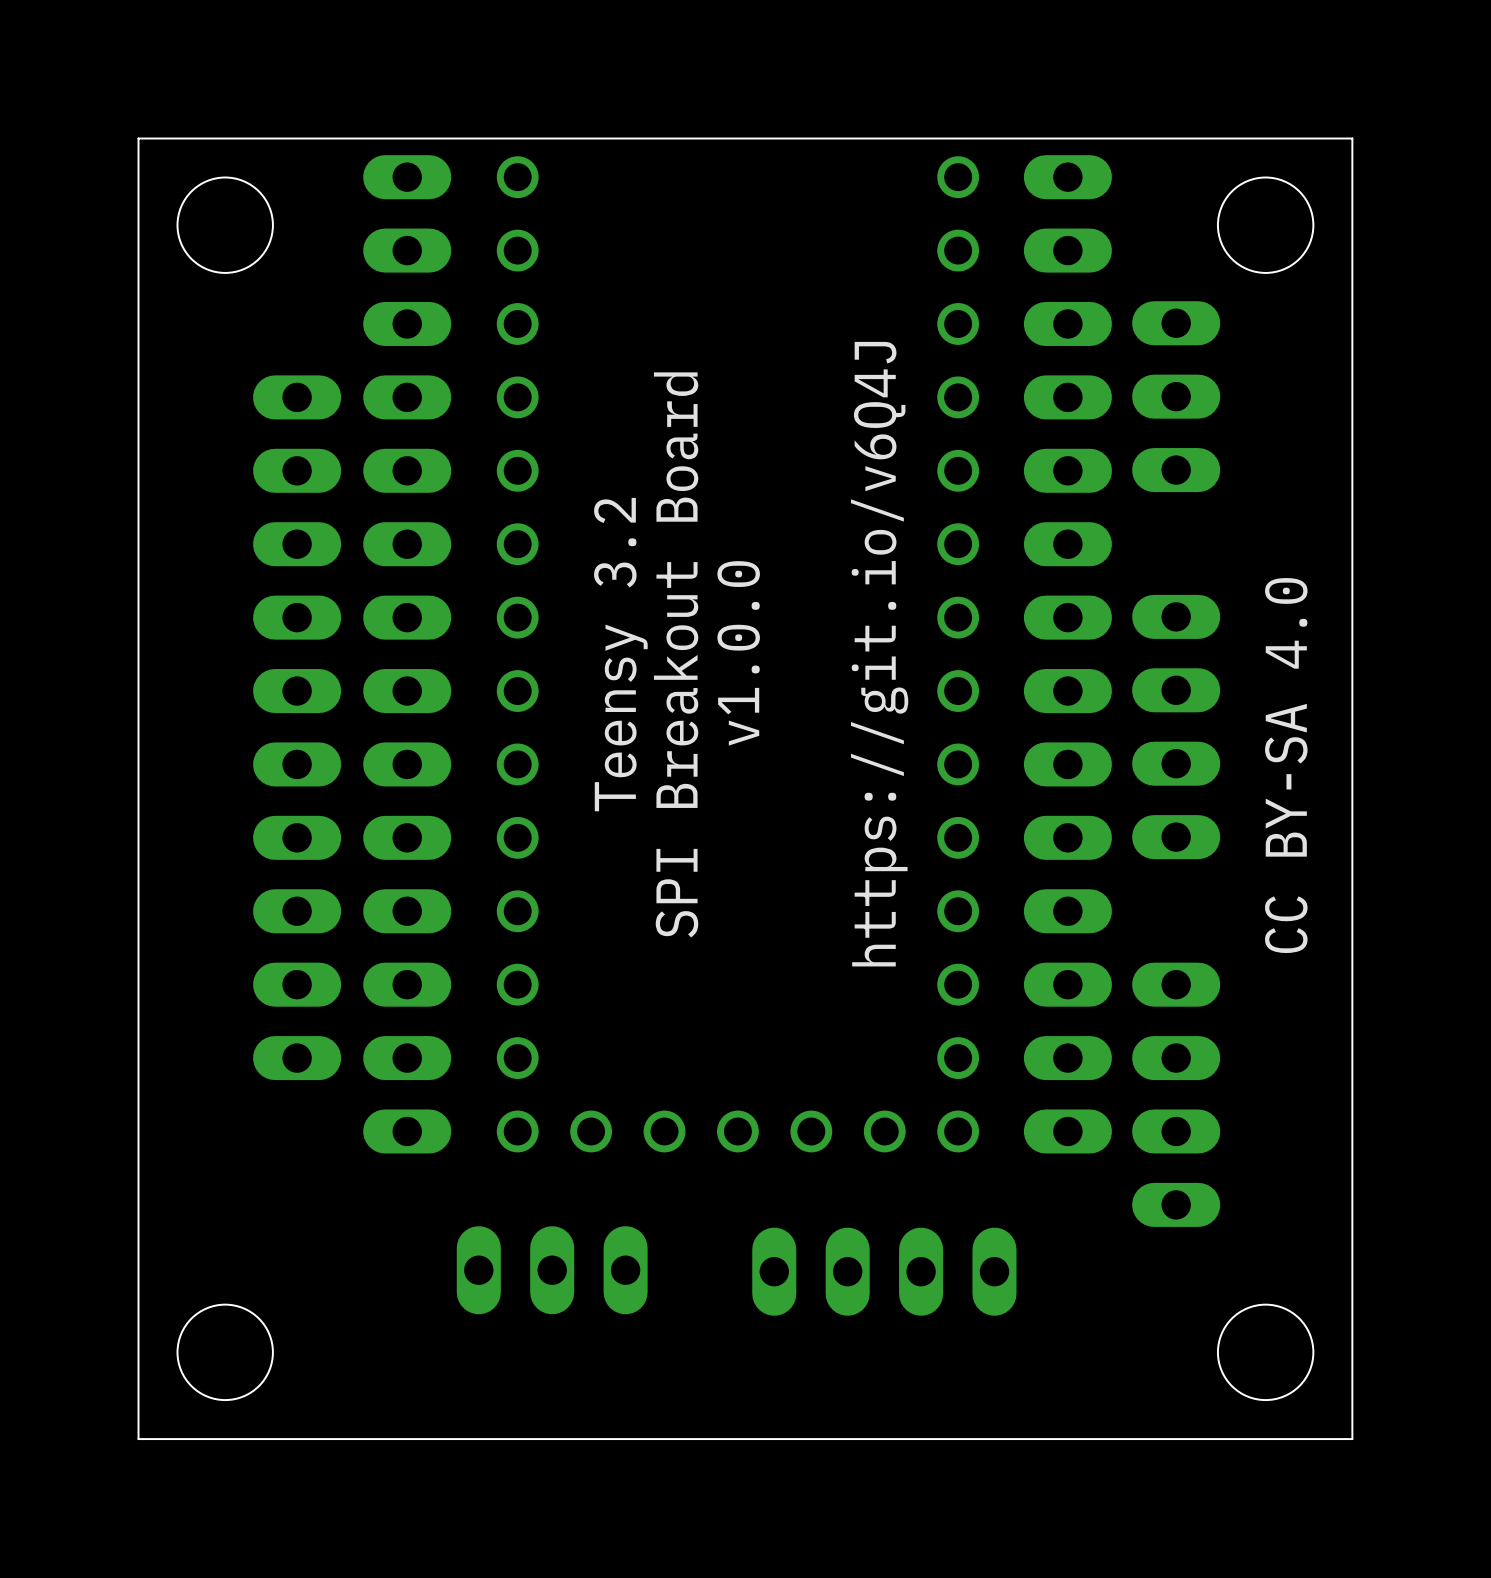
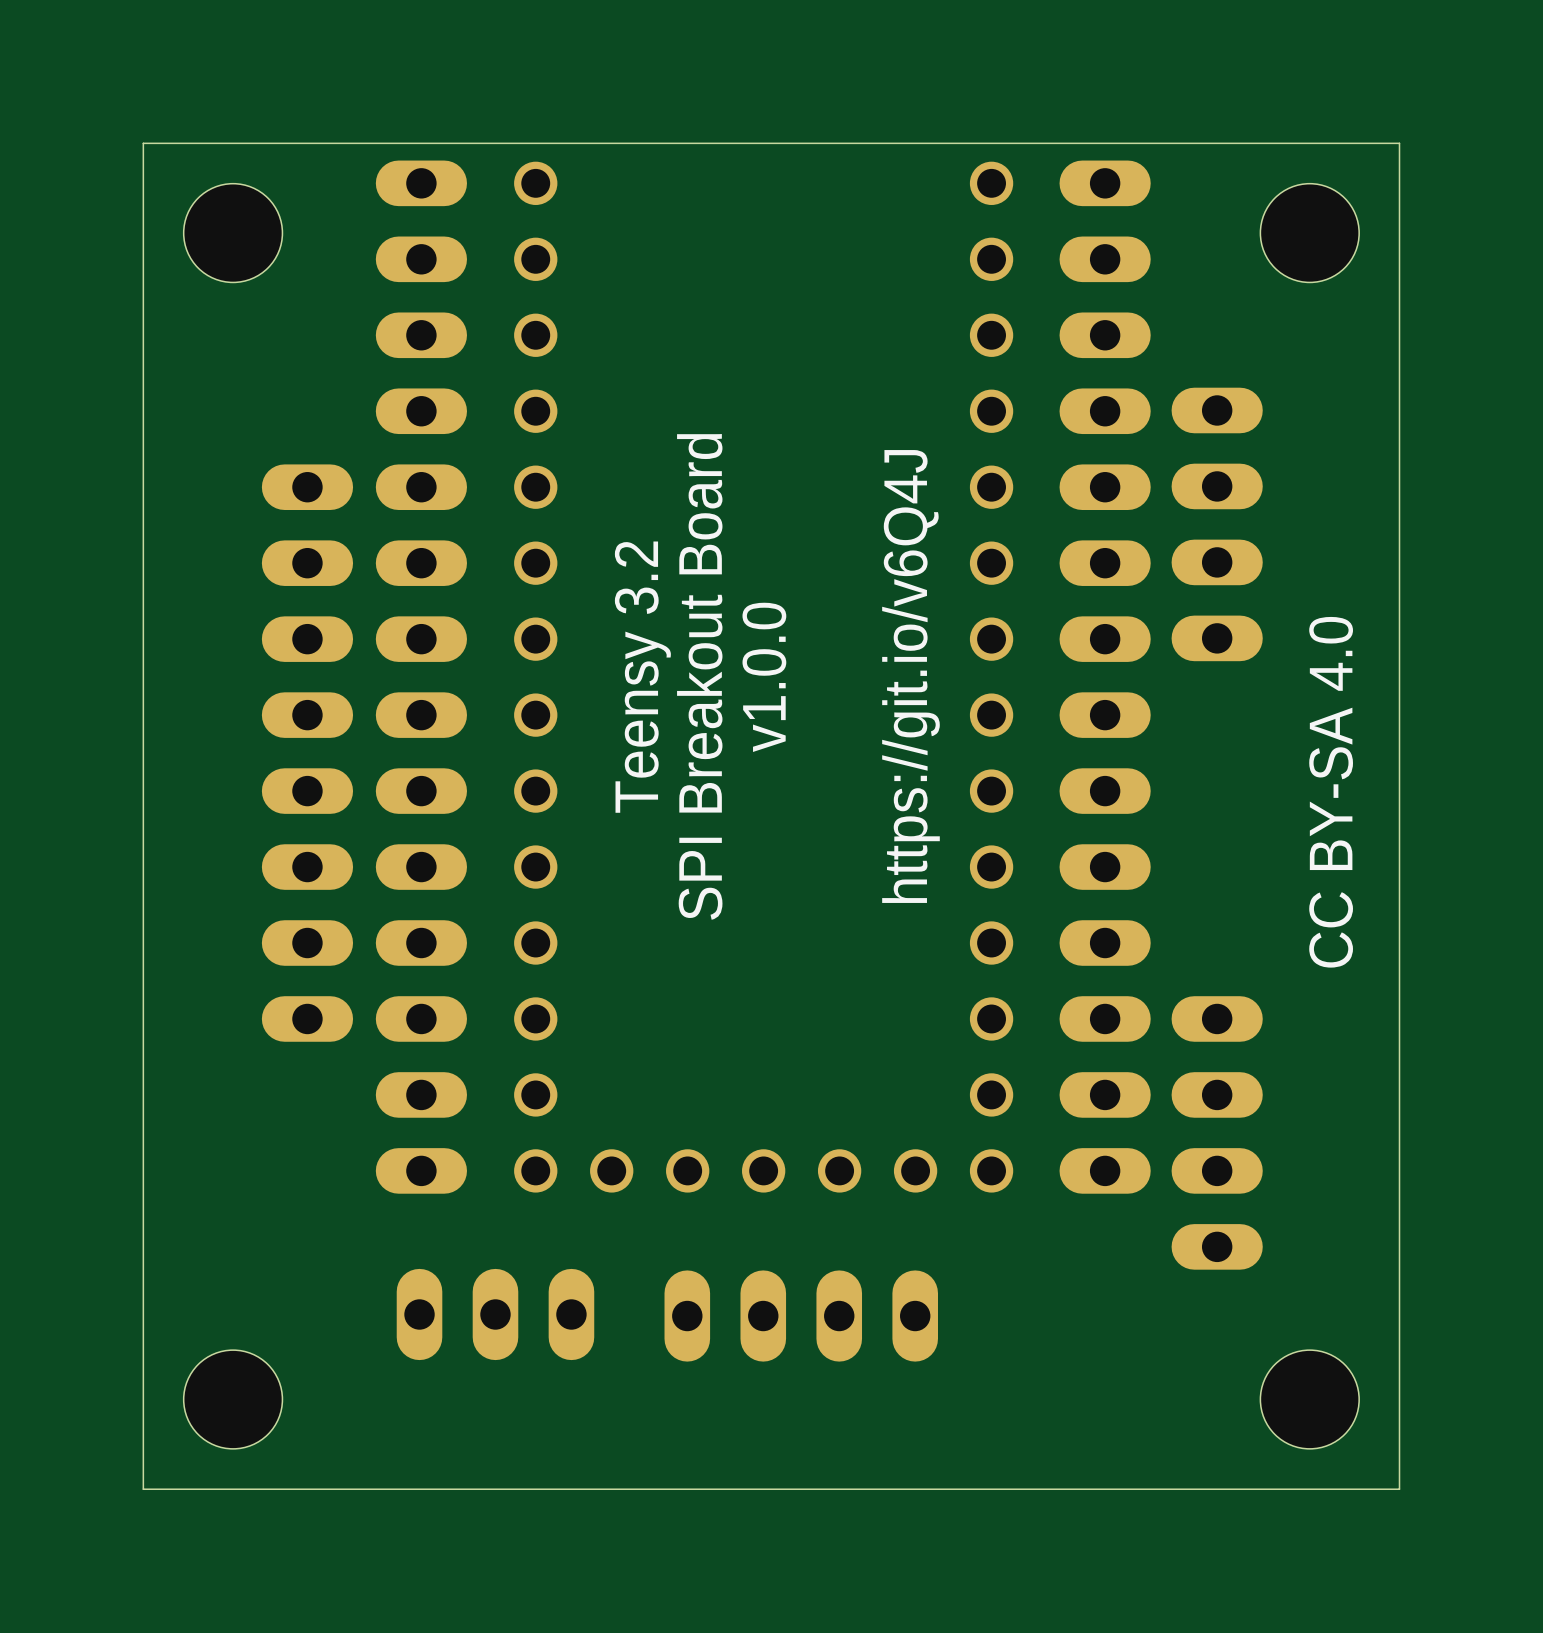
part footprint: [253, 375, 342, 1081] -> [261, 464, 354, 1042]
part: (1176, 396) -> none
part position: (1176, 727) -> (1217, 524)
part position: (552, 1270) -> (495, 1314)
part position: (884, 1271) -> (801, 1316)

